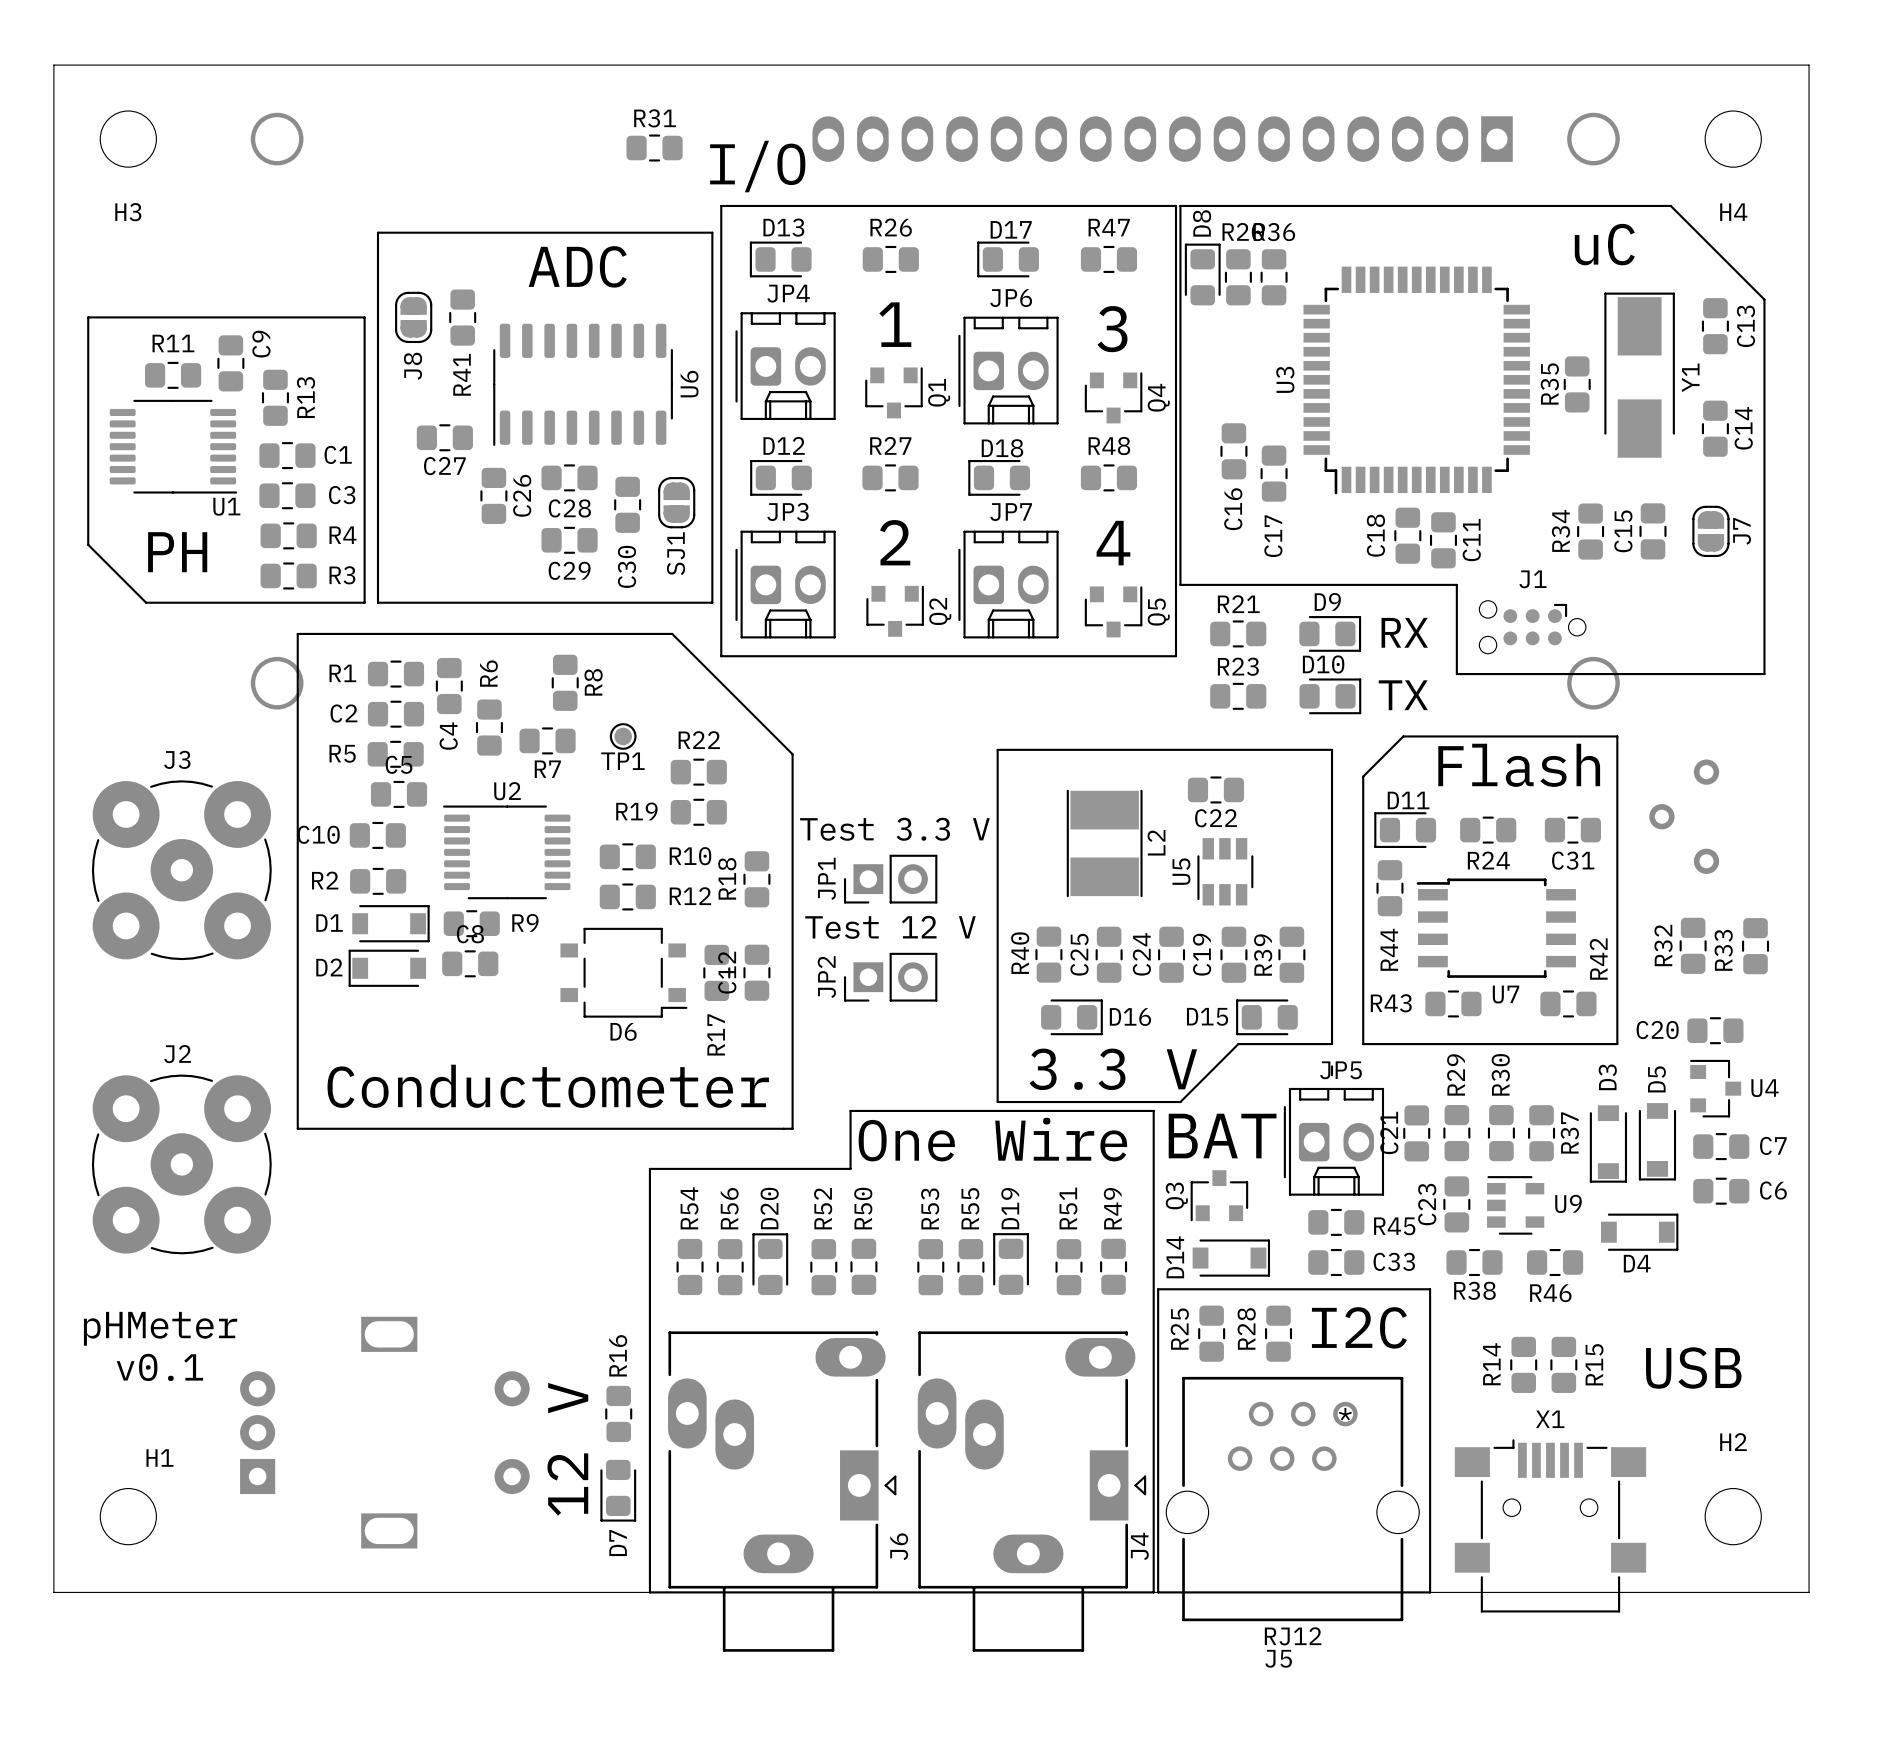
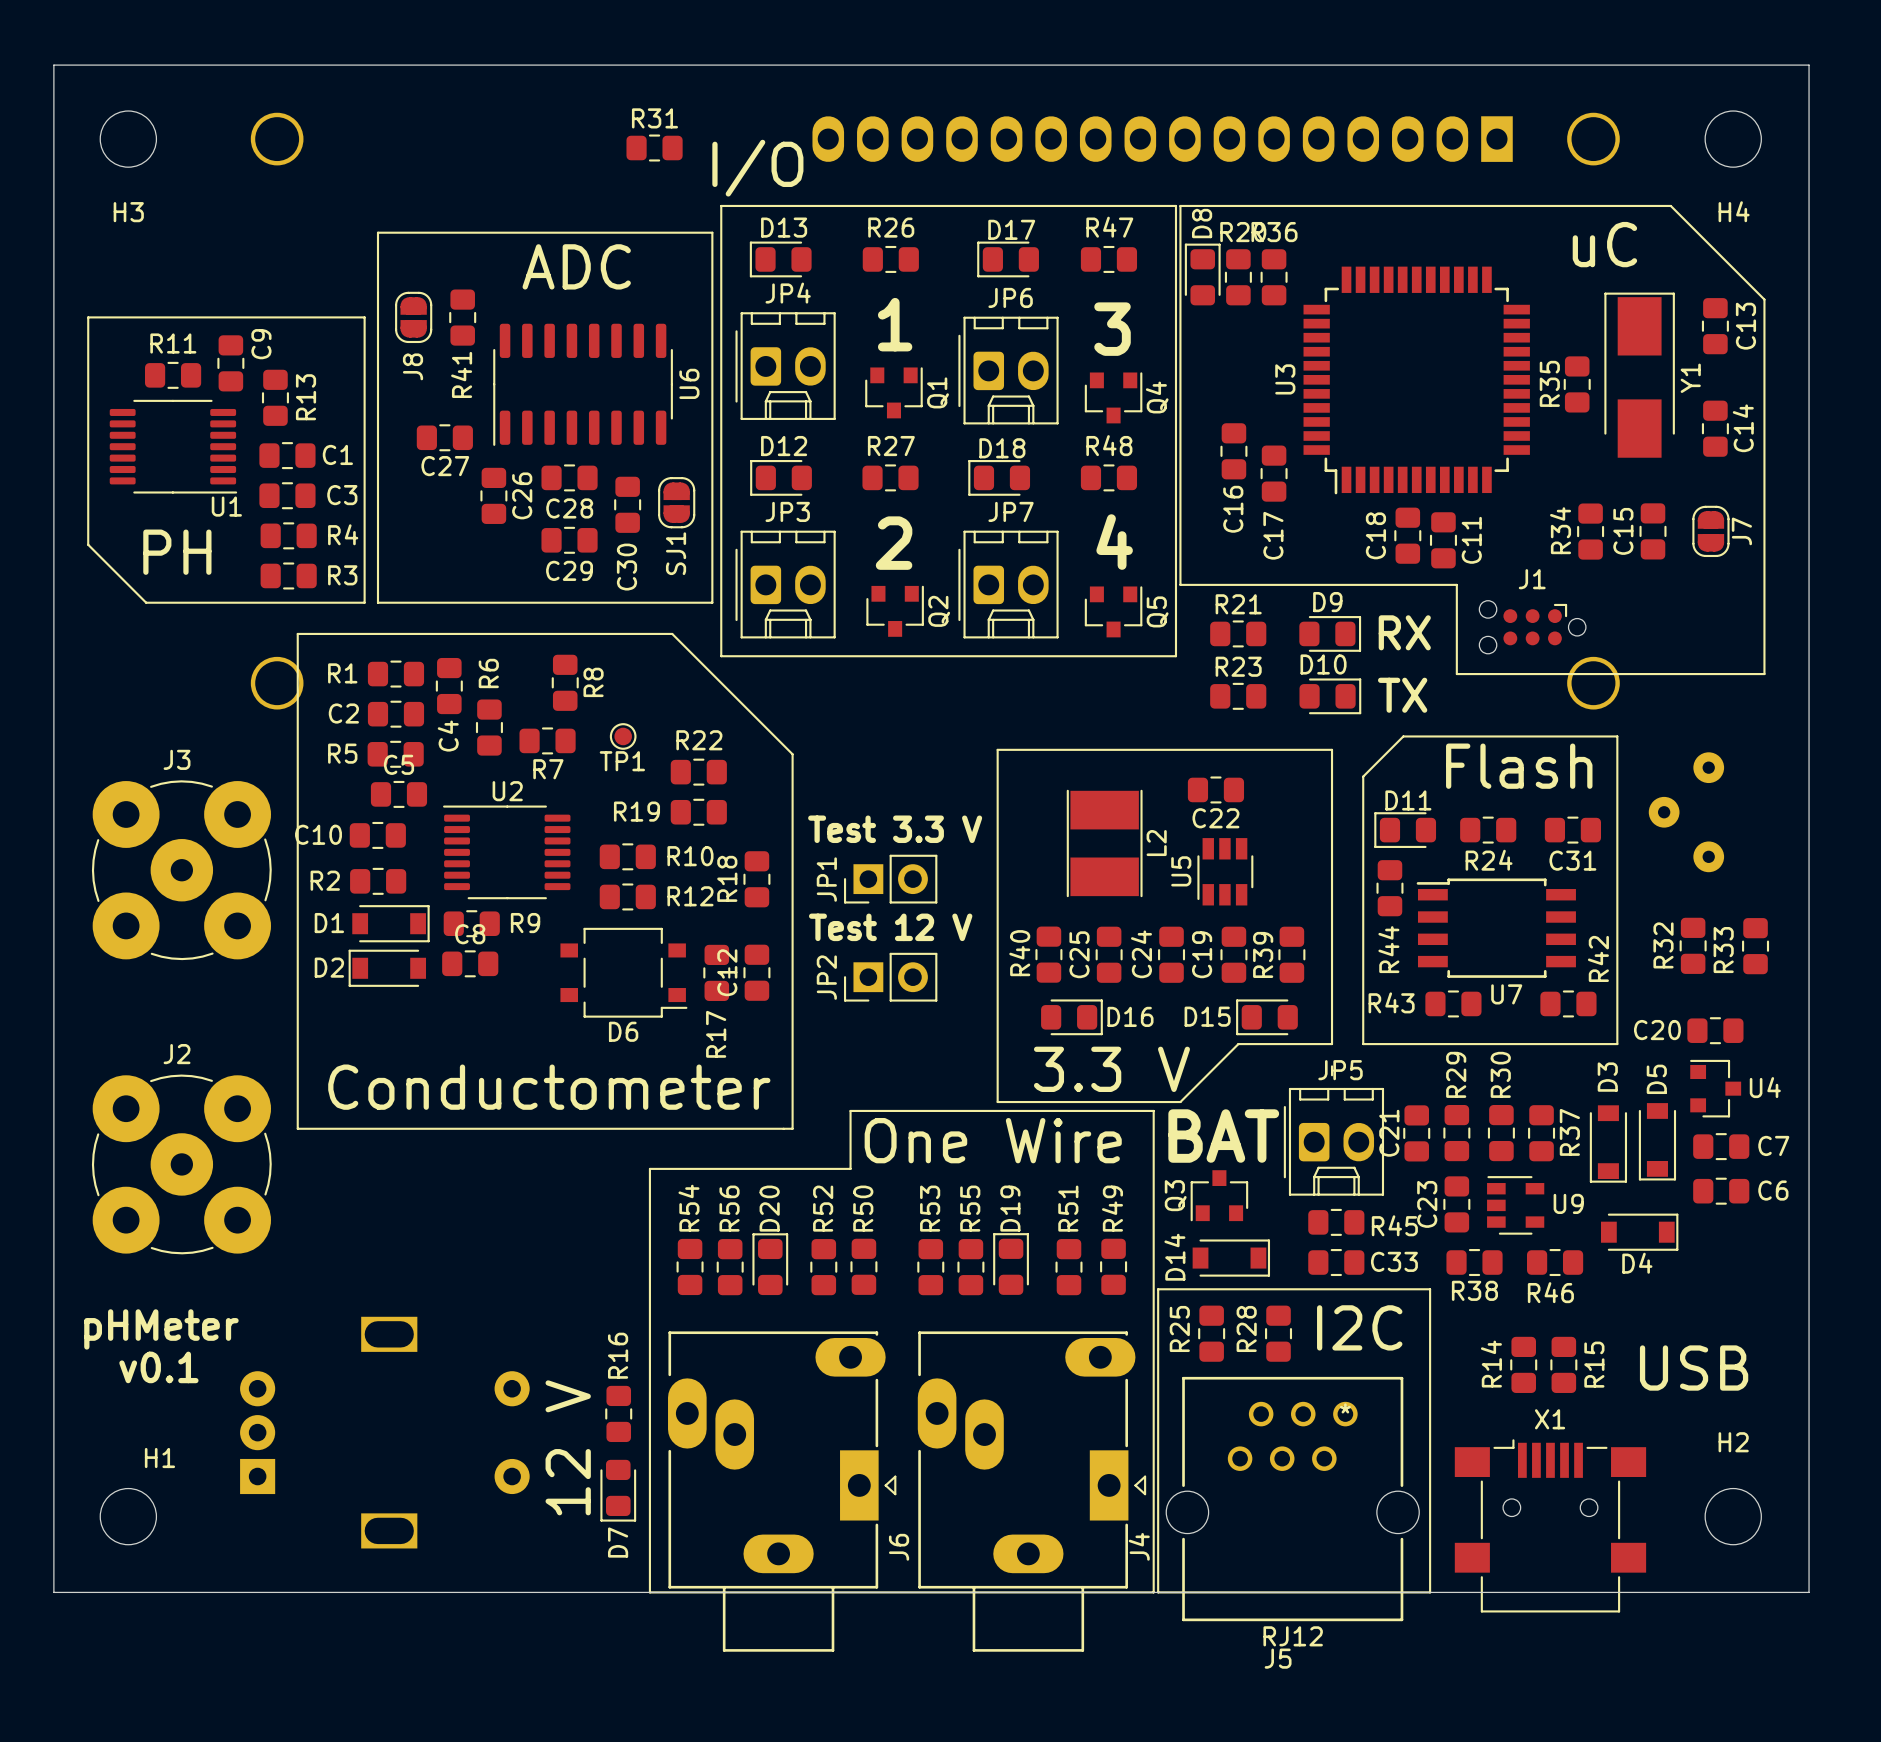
part footprint: [1649, 759, 1720, 874] -> [1648, 752, 1725, 873]

